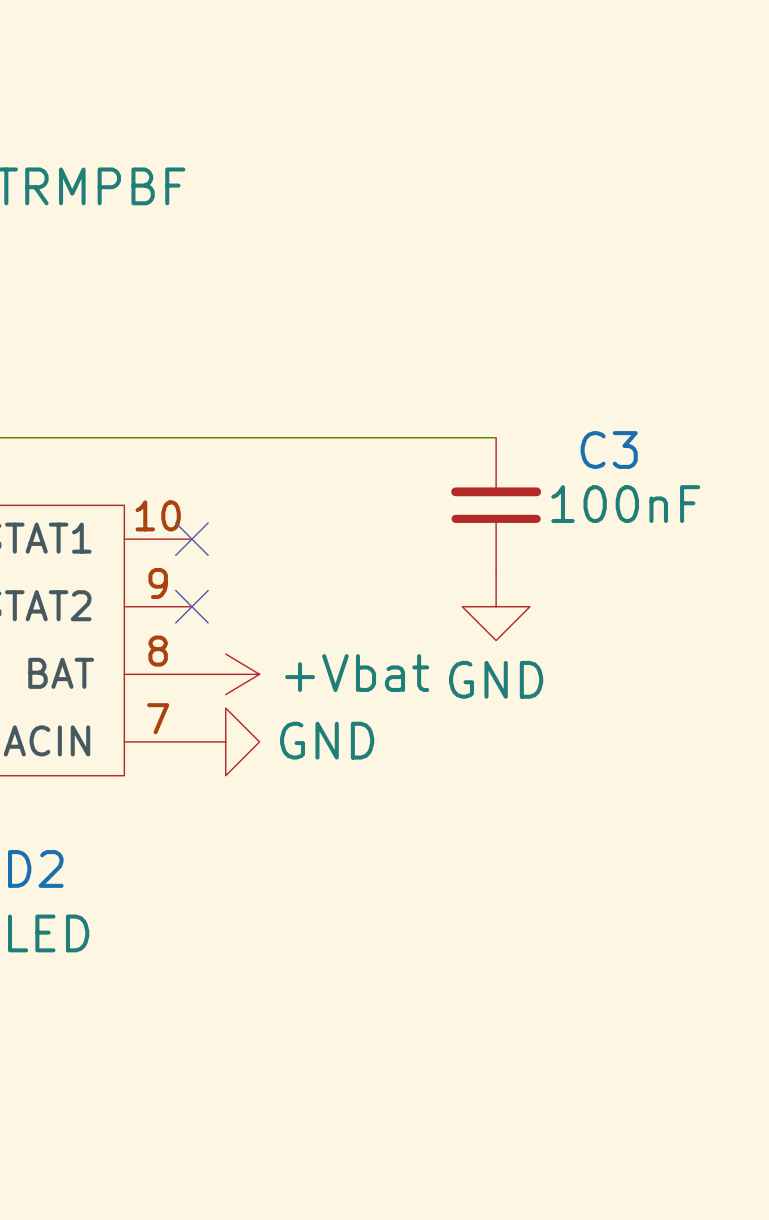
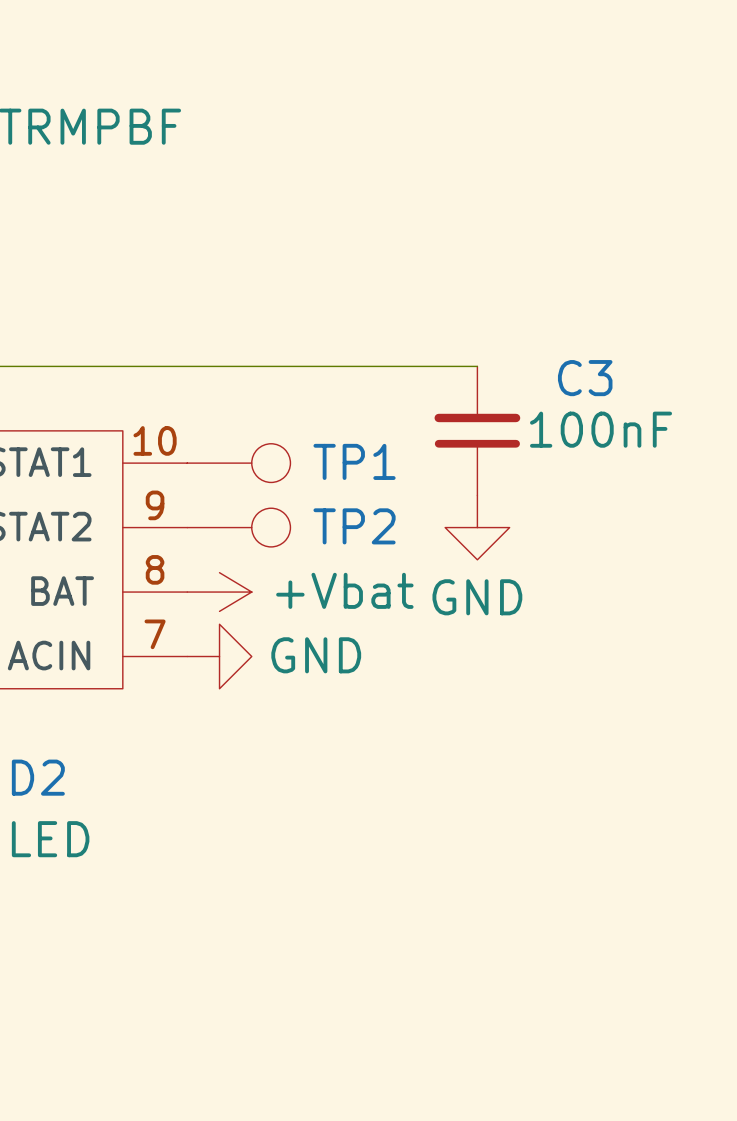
no-connect mark: (191, 539) -> none
TP1: none -> (238, 463)
no-connect mark: (191, 606) -> none
TP2: none -> (238, 527)

